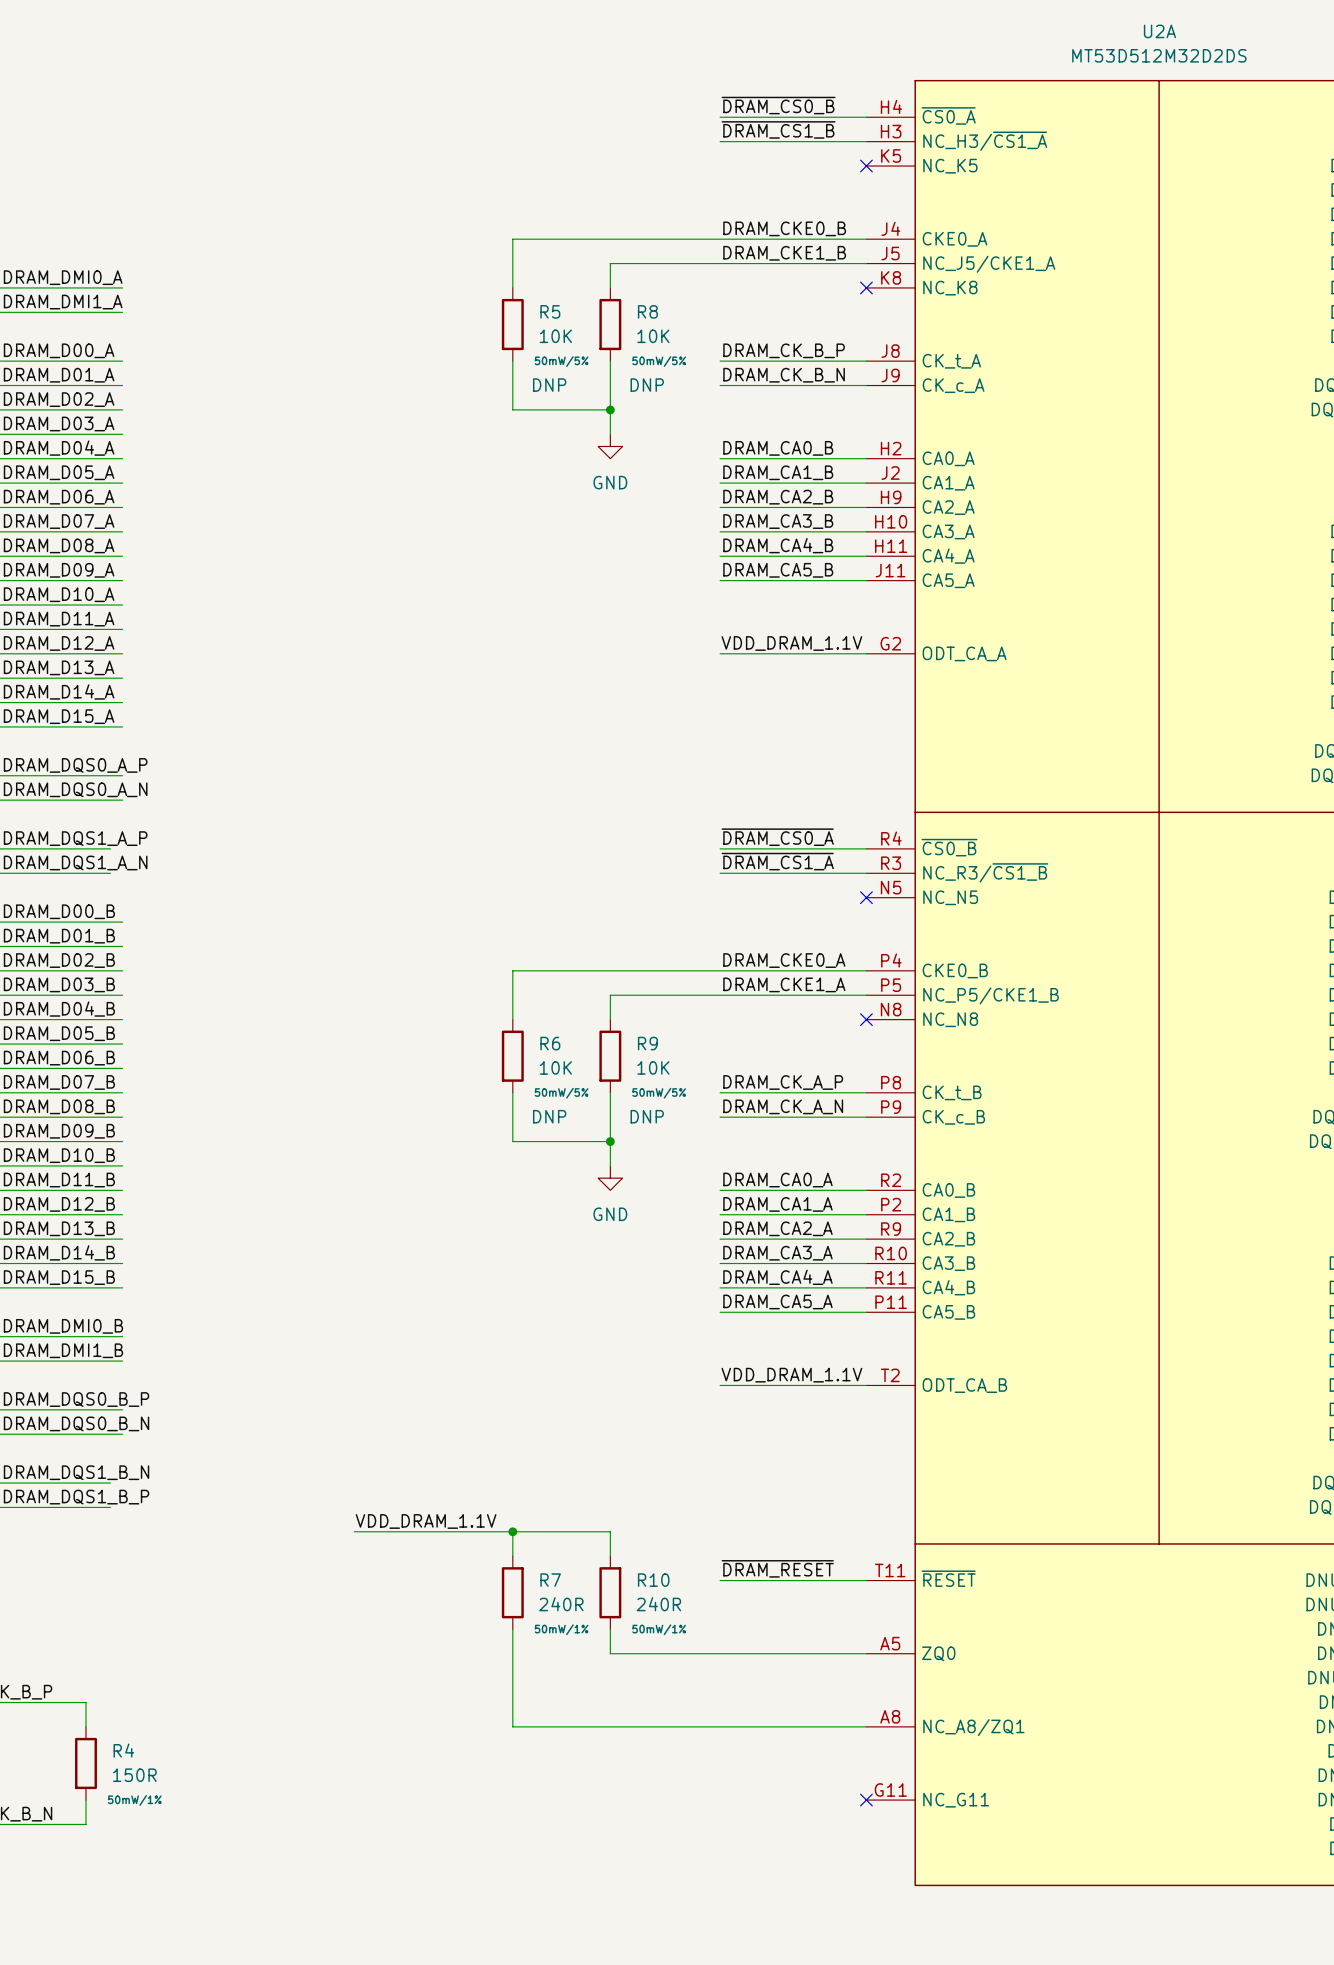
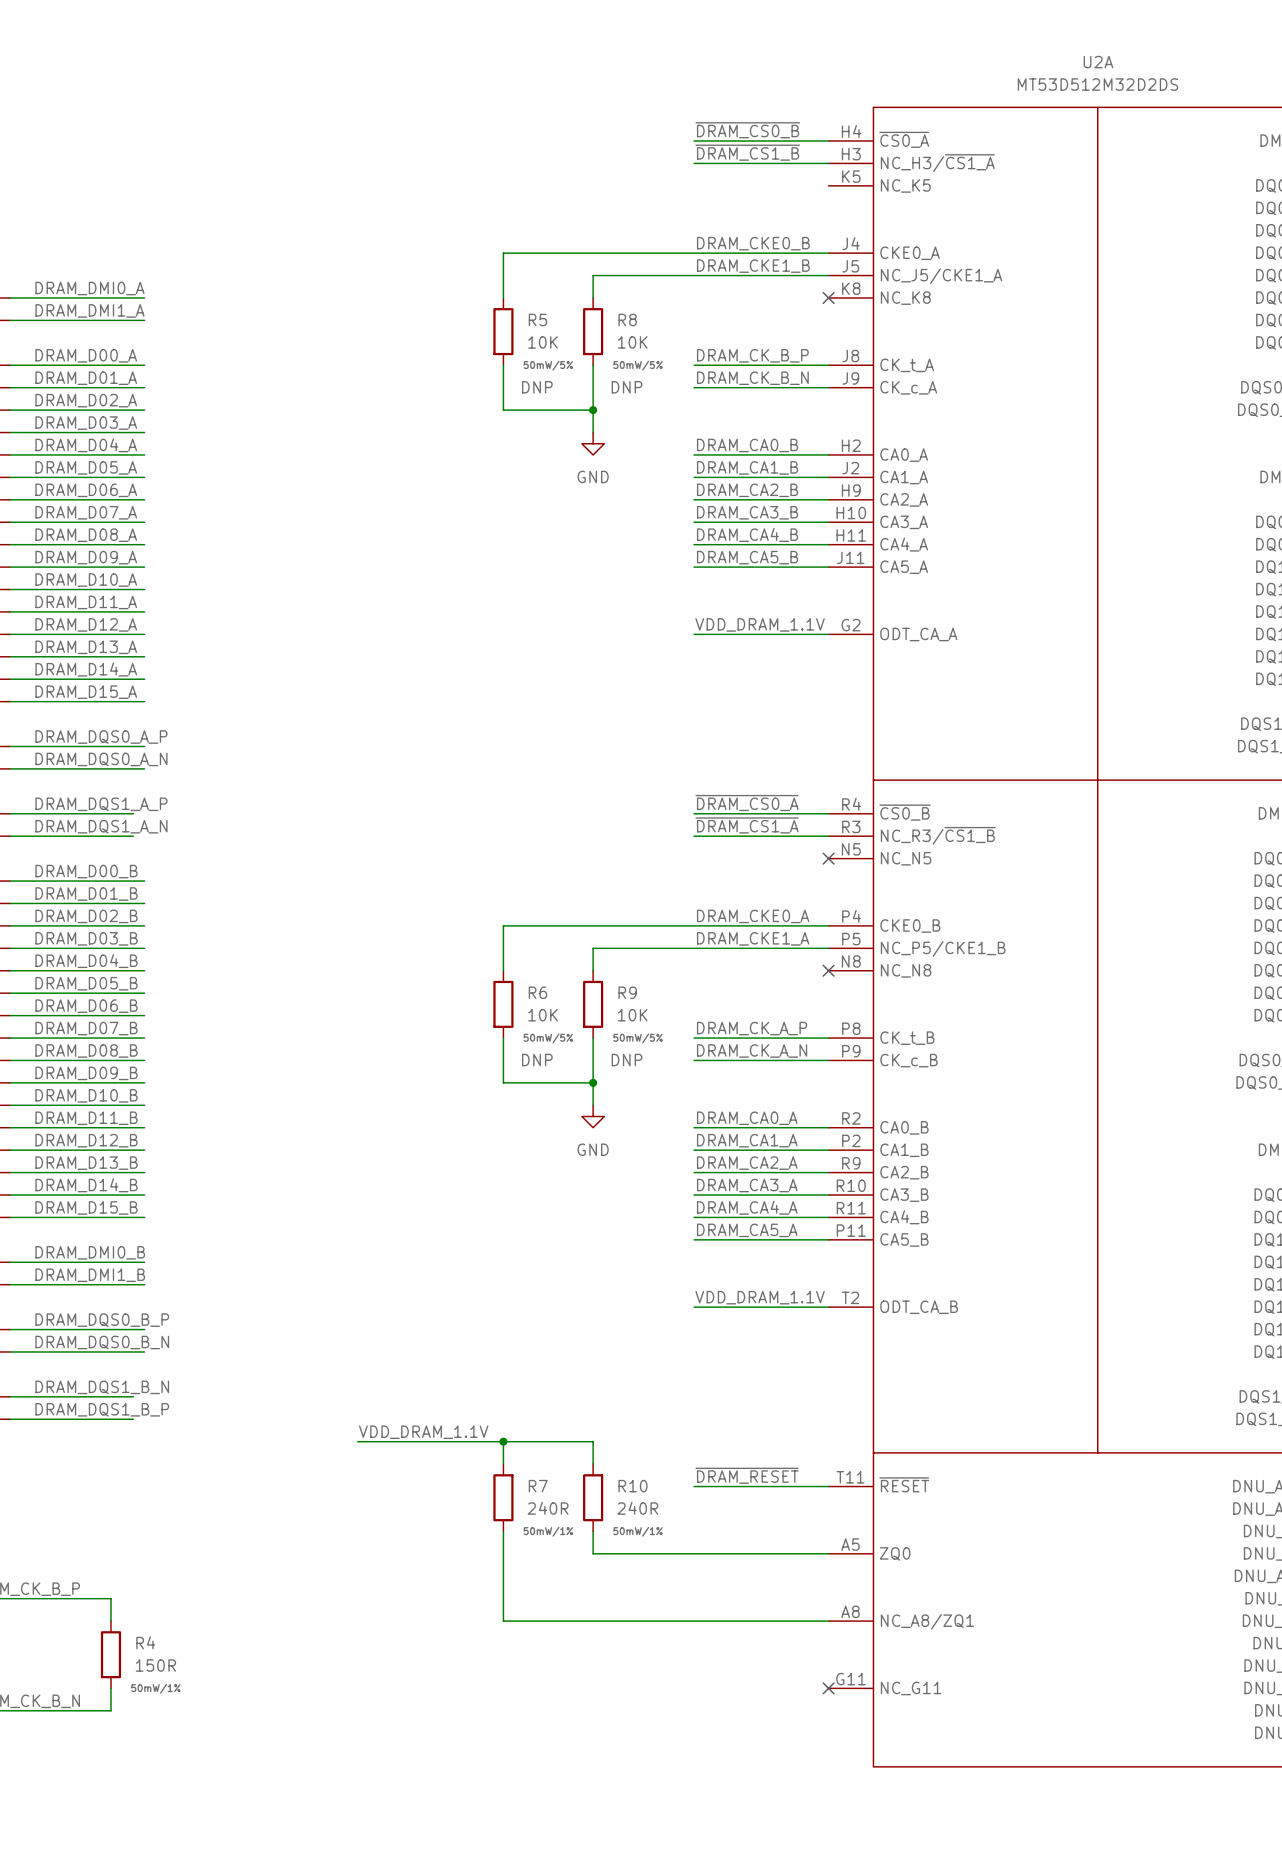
no-connect mark: (866, 166) -> none

